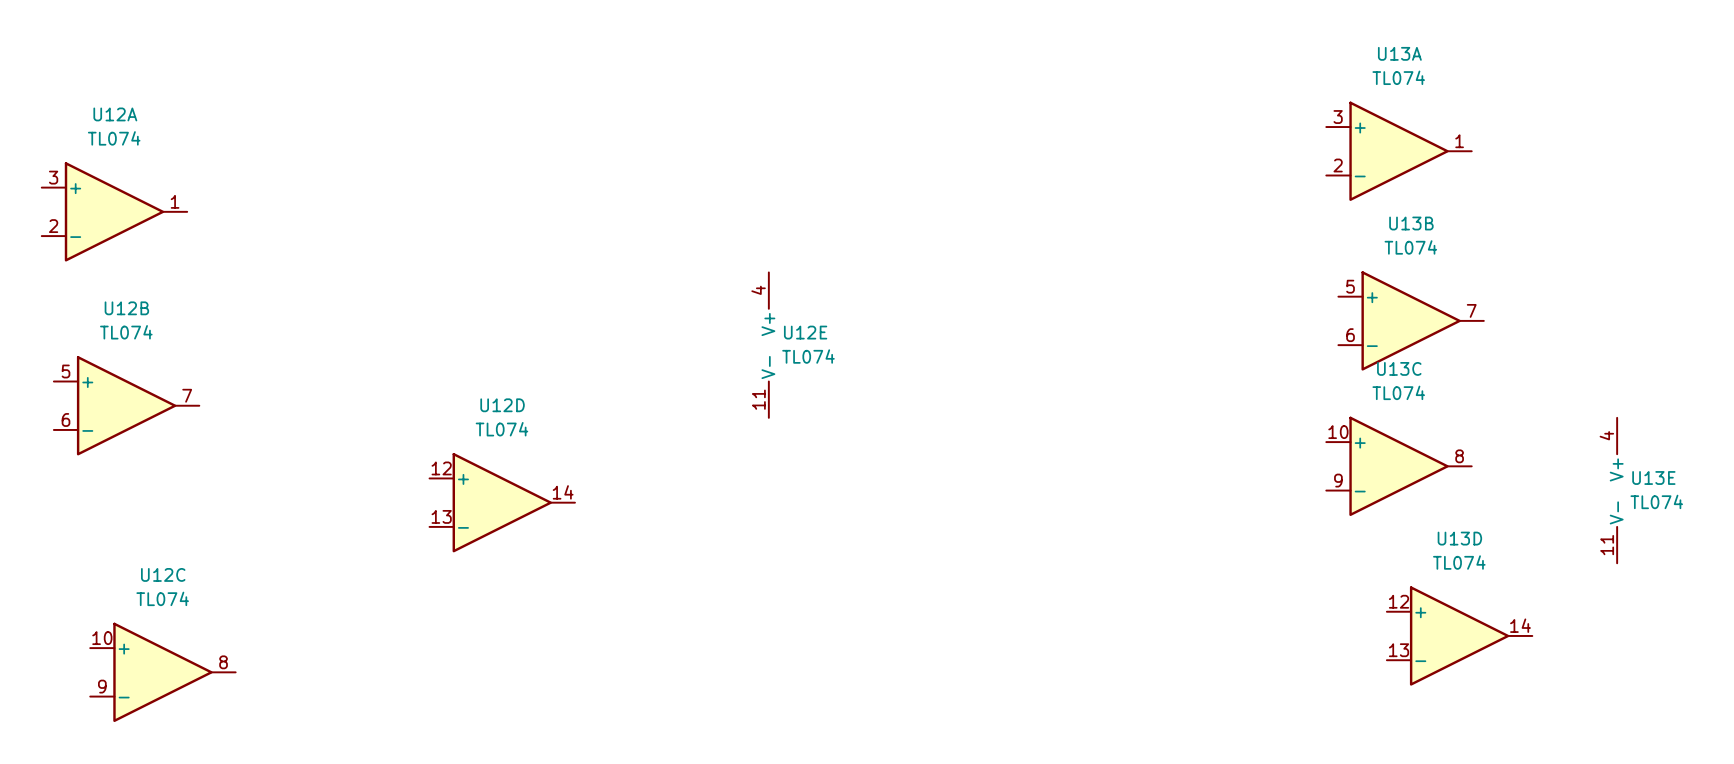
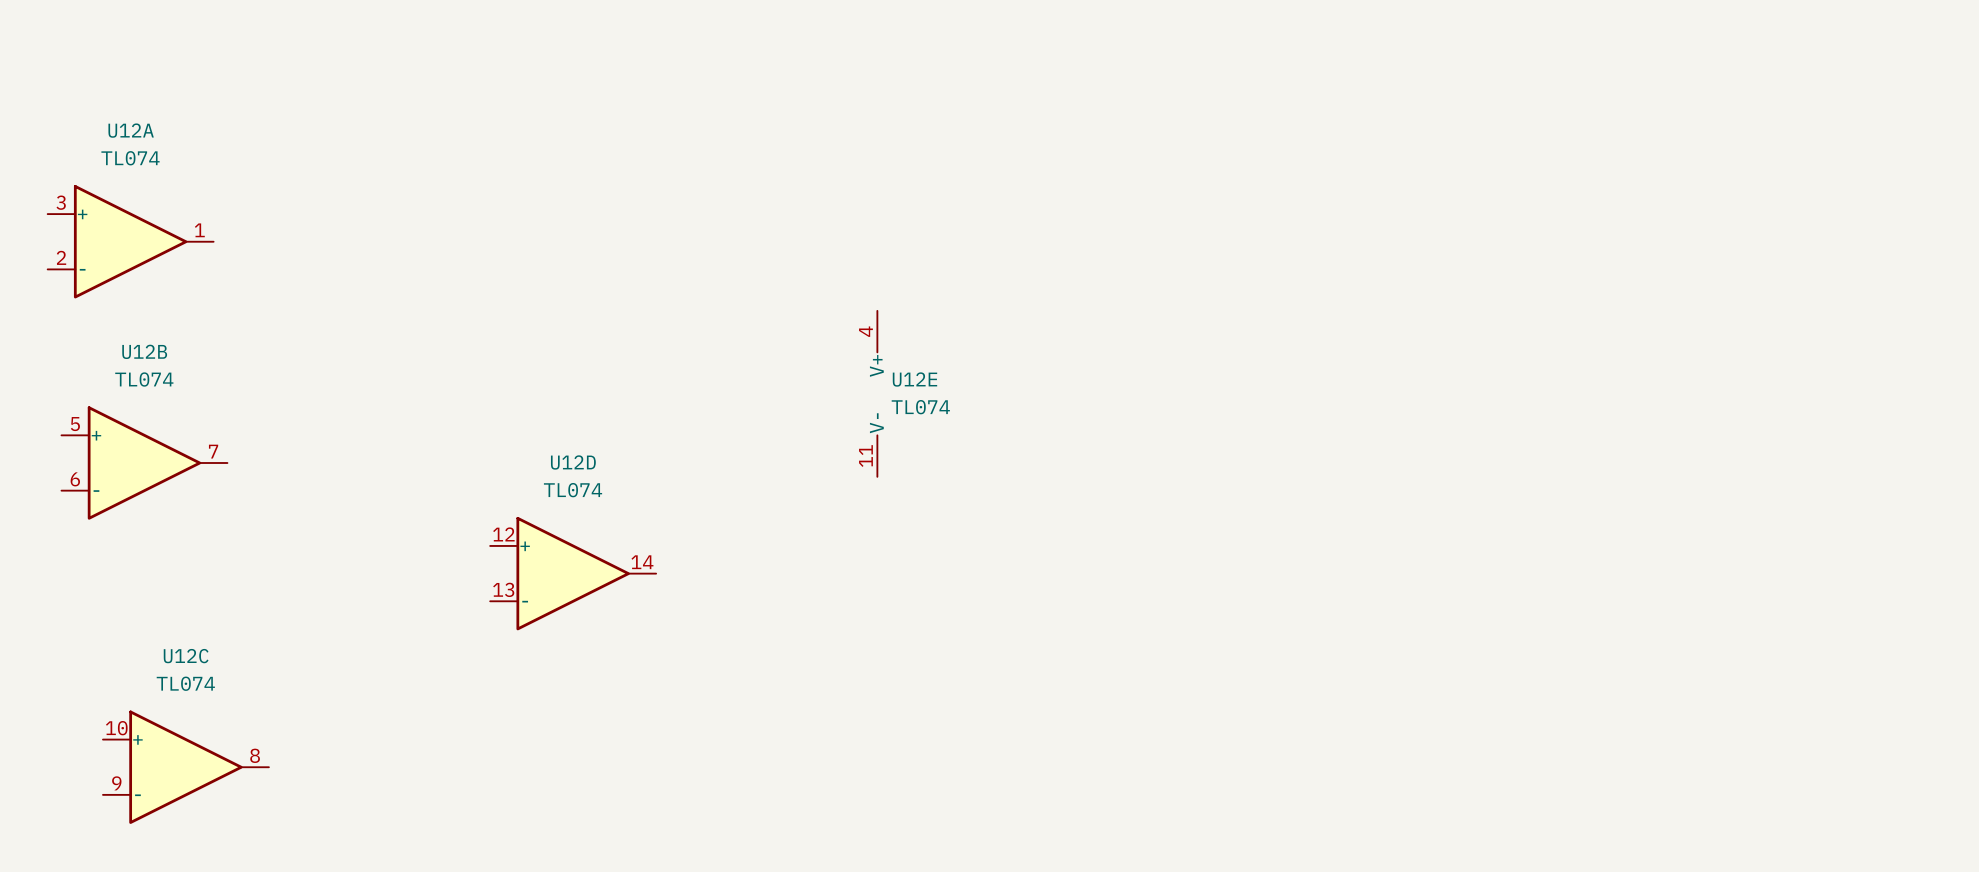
U13A: TL074 (1399, 151) -> none
U13B: TL074 (1411, 320) -> none
U13C: TL074 (1399, 466) -> none
U13E: TL074 (1617, 490) -> none
U13D: TL074 (1459, 635) -> none

